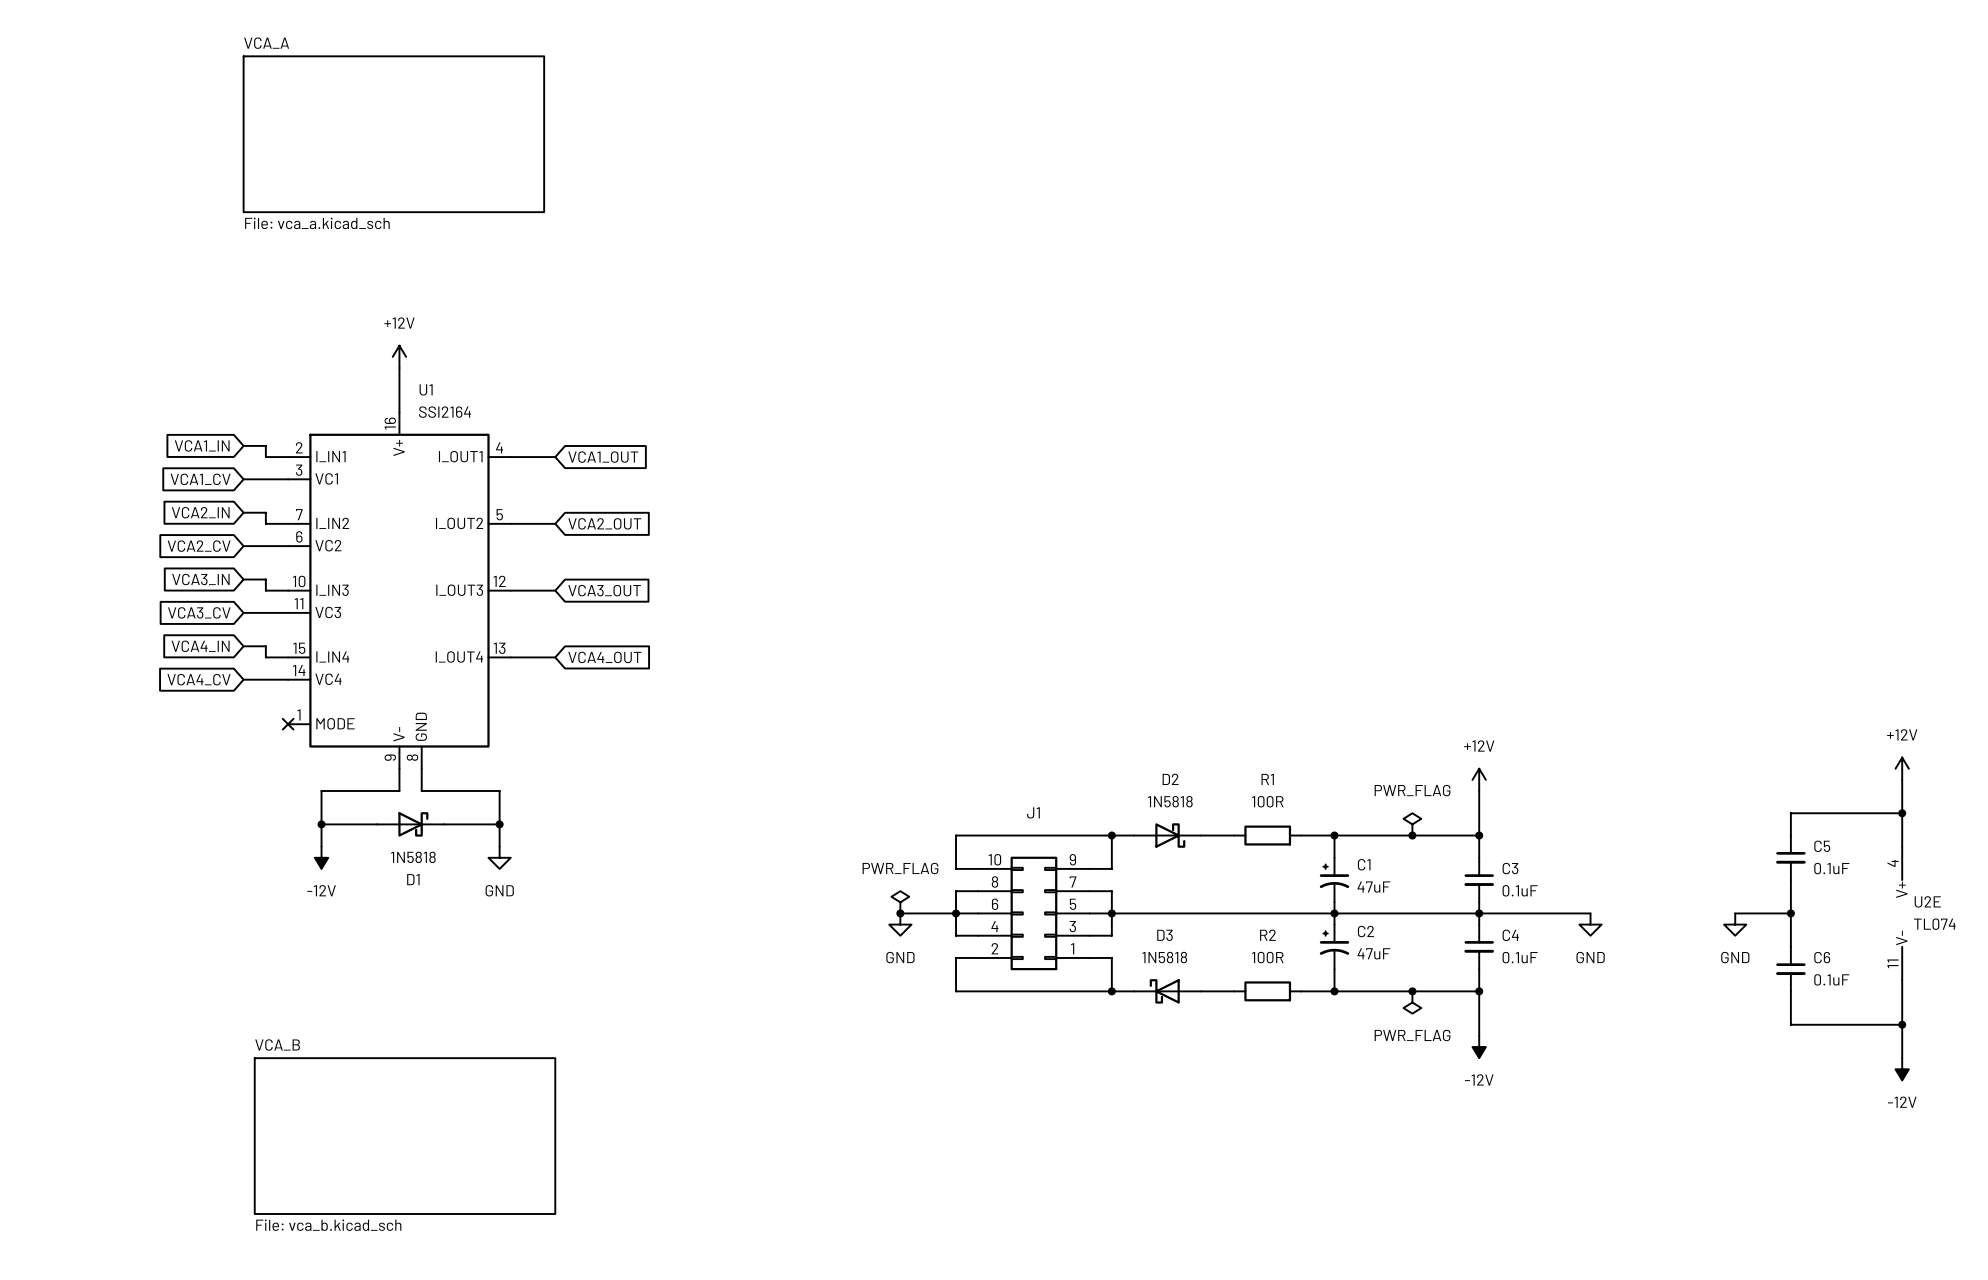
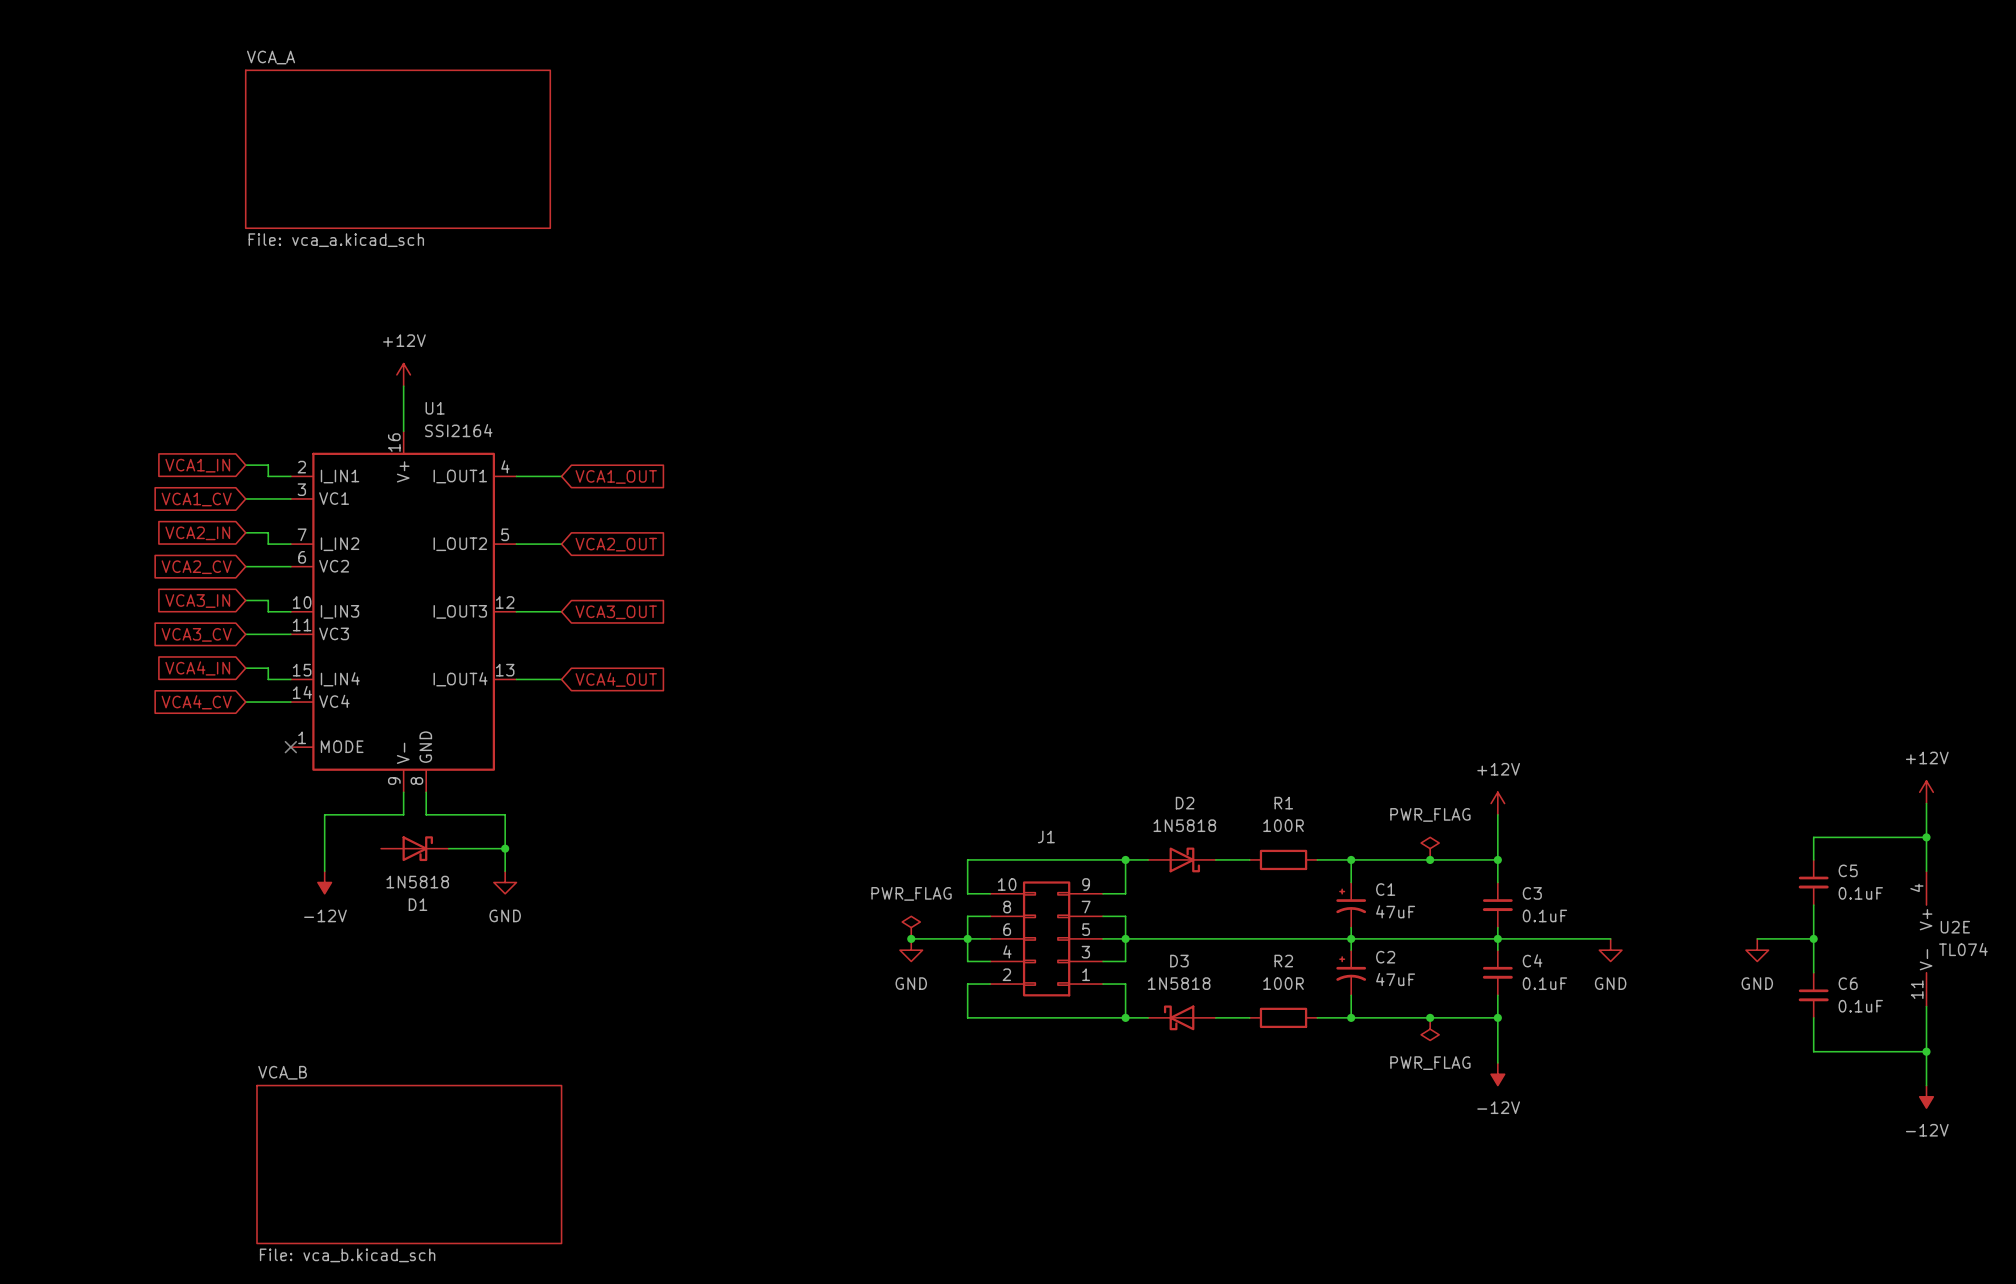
wire: (321, 824) (377, 824) -> none
junction: (321, 824) -> none

